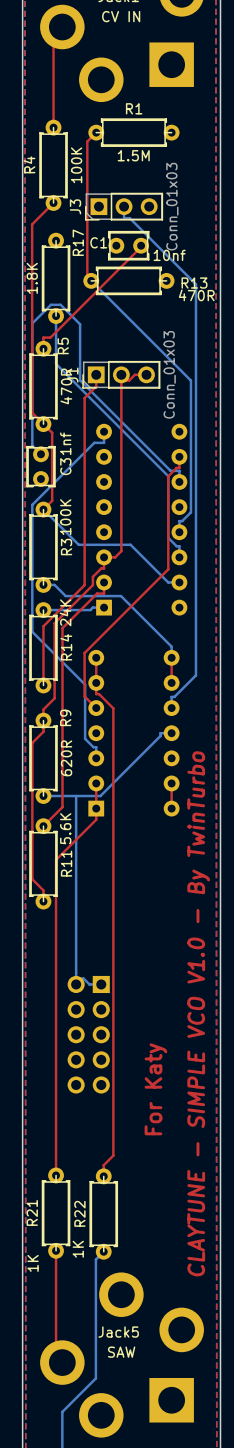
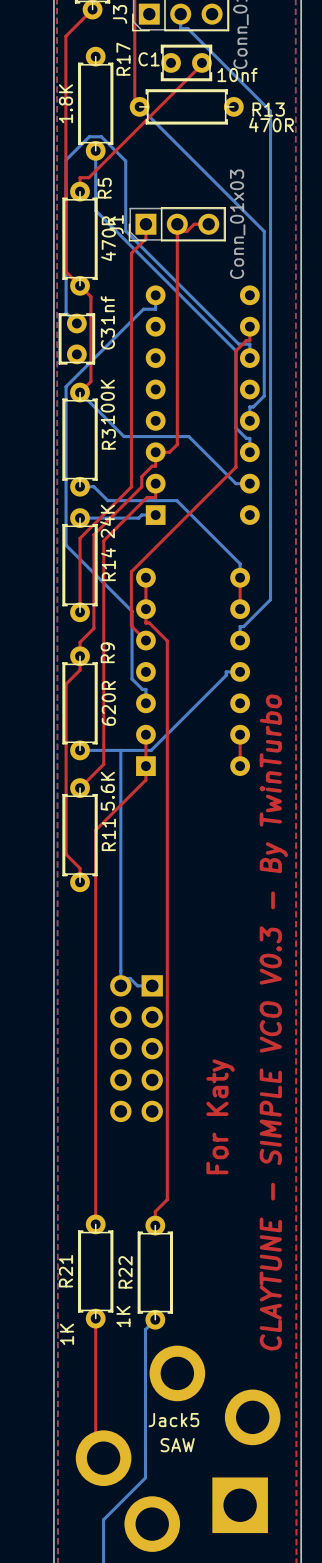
text: CLAYTUNE - SIMPLE VCO V1.0 - By TwinTurbo (198, 1013) -> CLAYTUNE - SIMPLE VCO V0.3 - By TwinTurbo (273, 1022)

